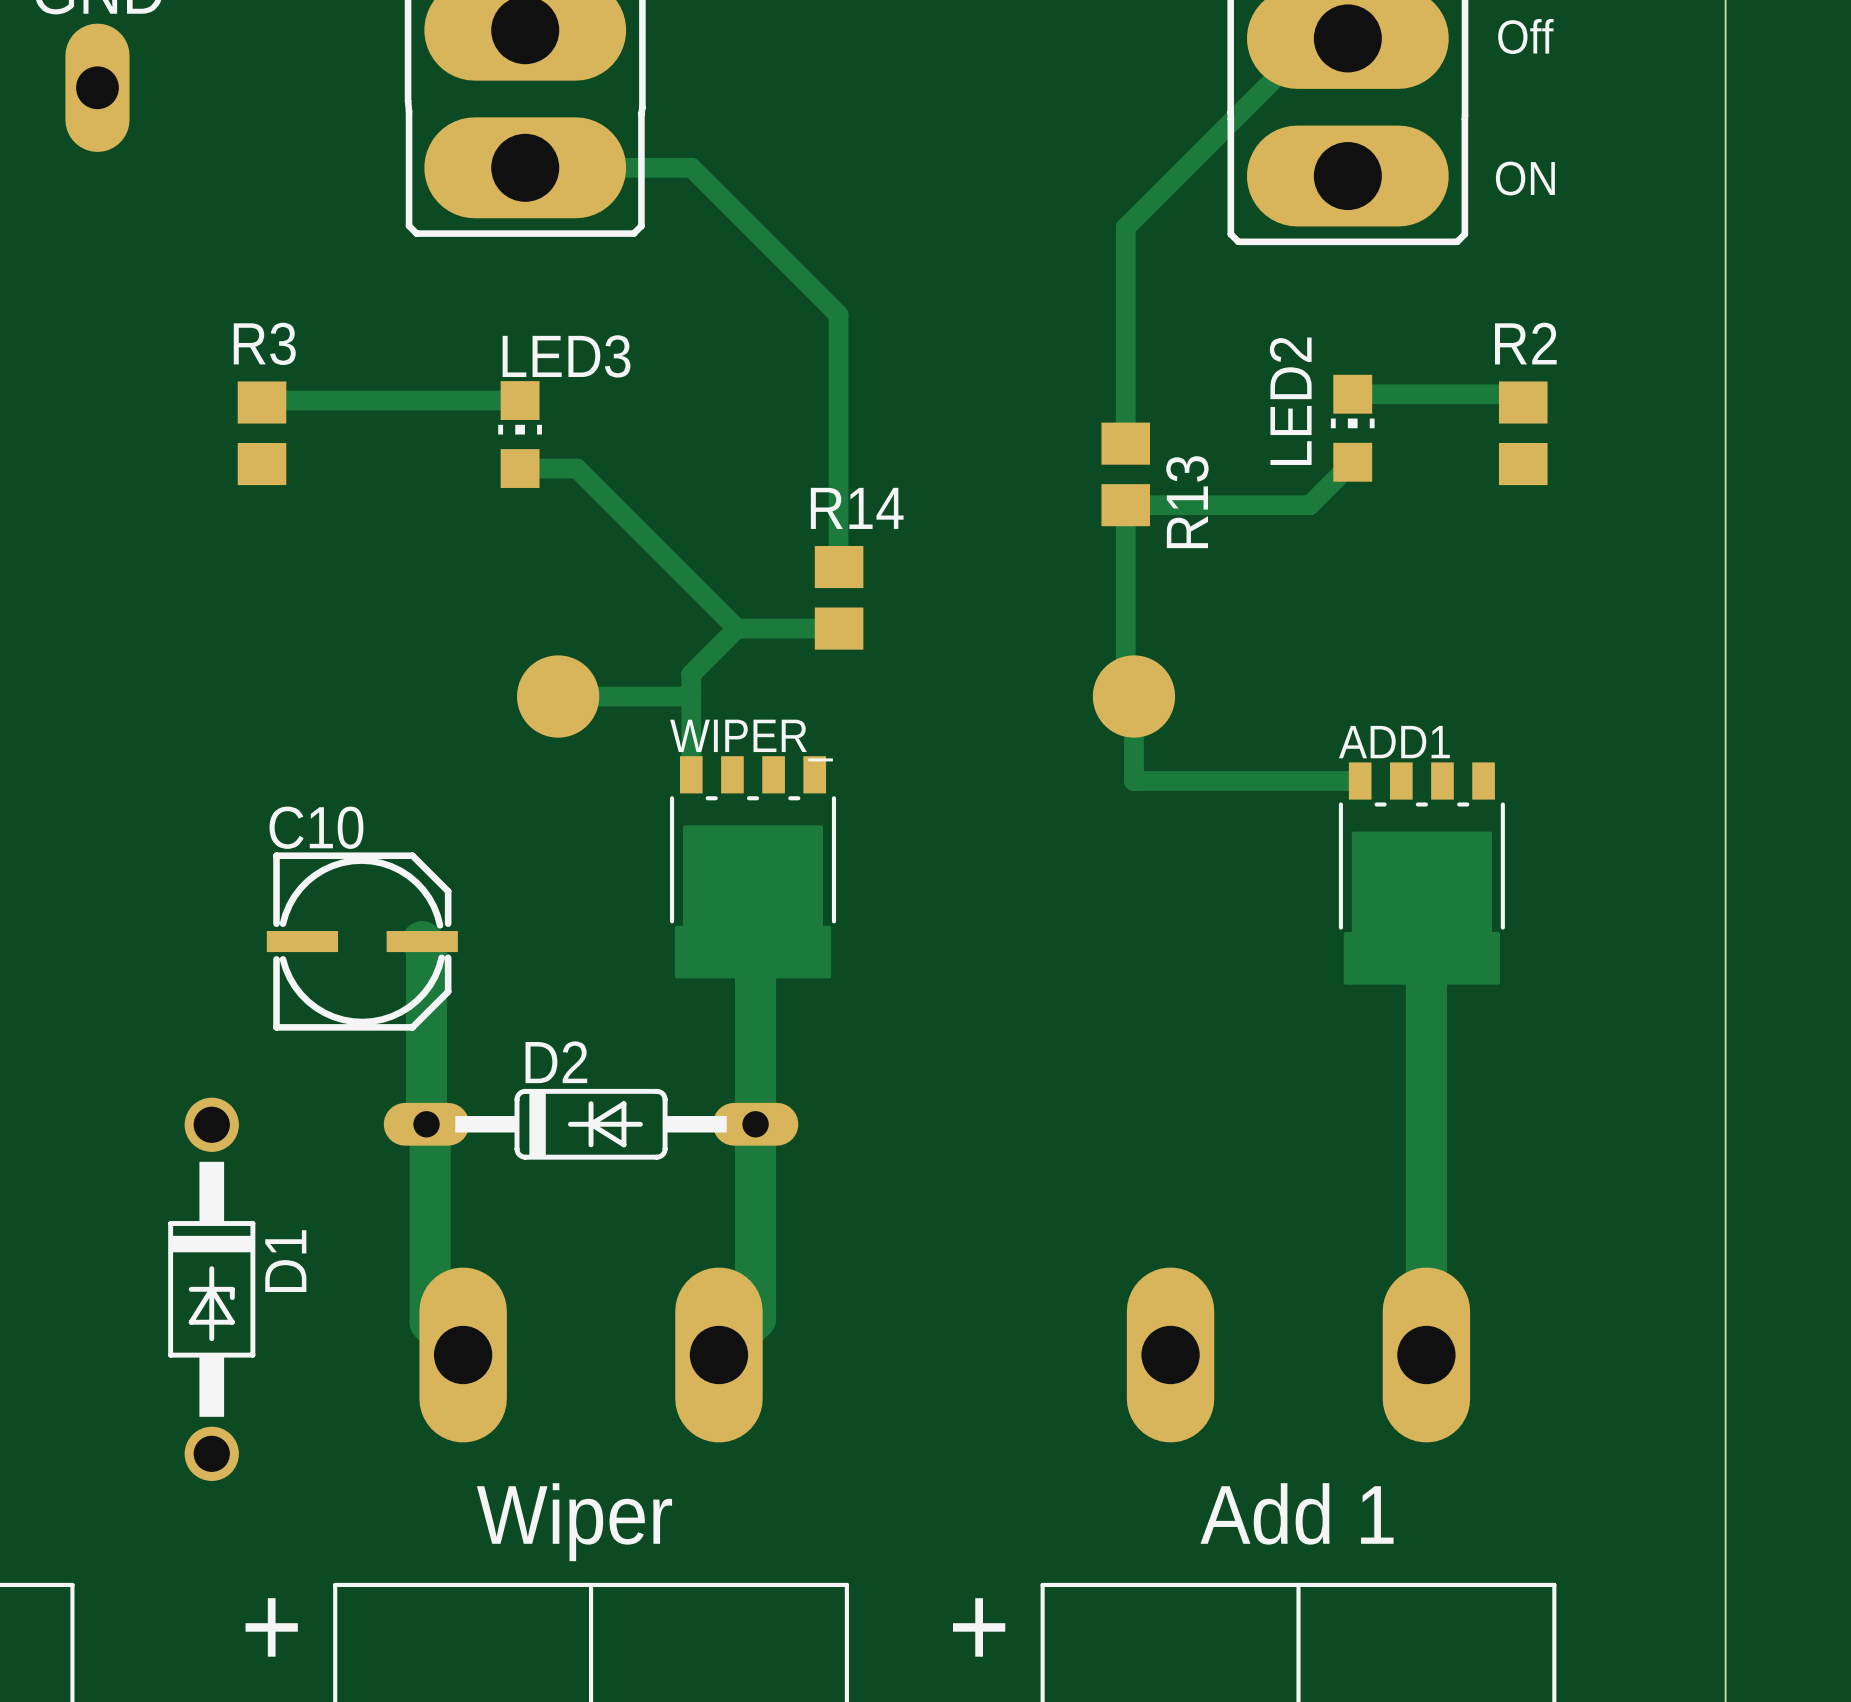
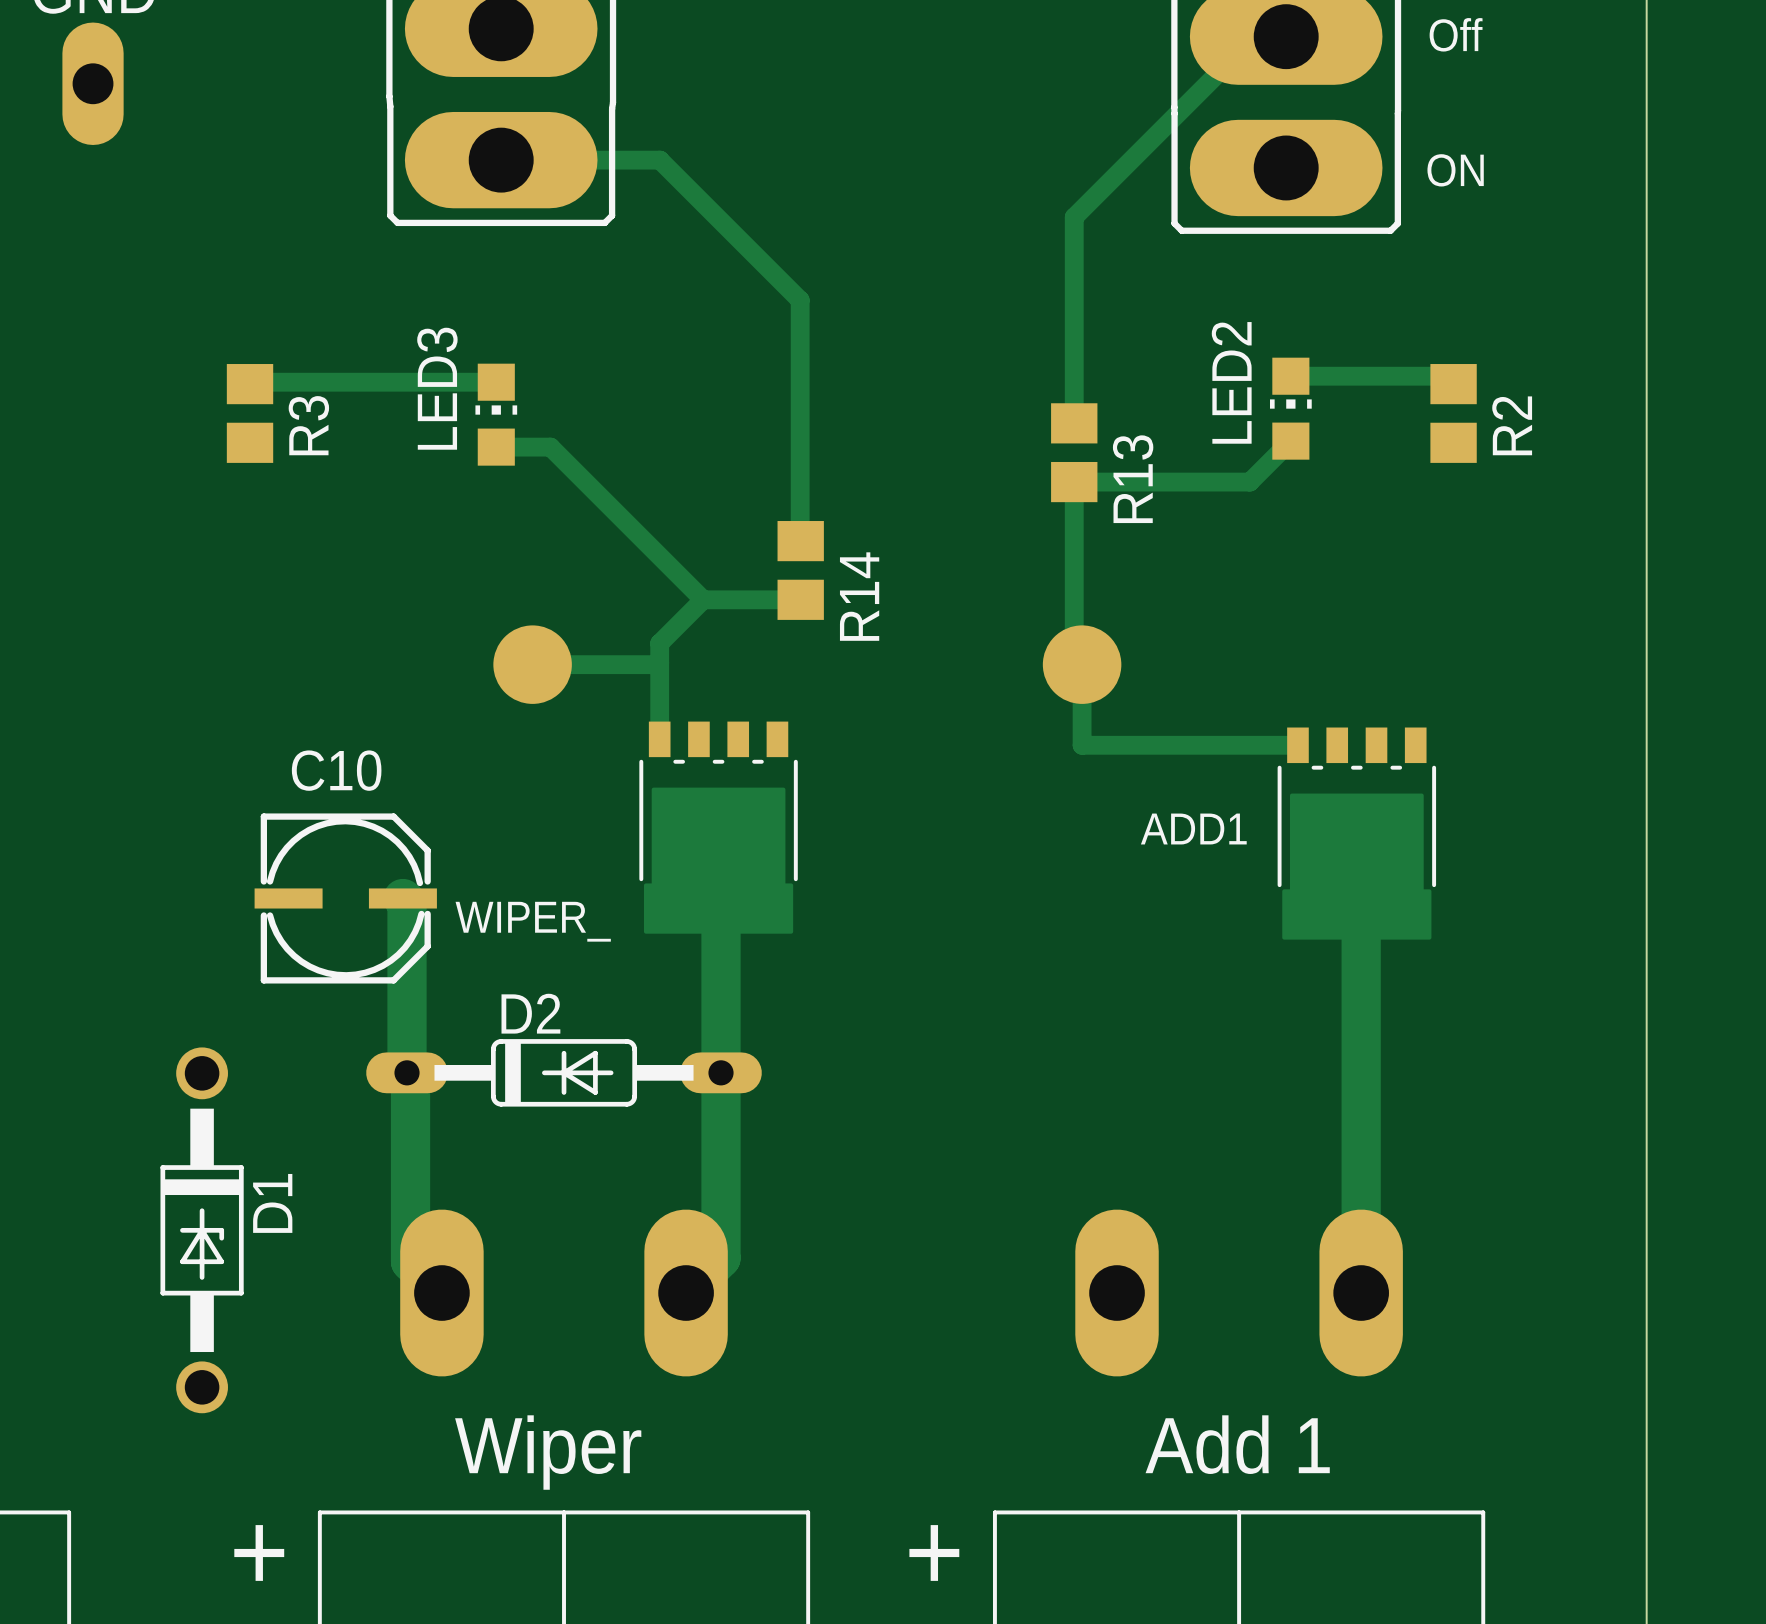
R3 name rotation: 0° (264, 343) -> 90° counterclockwise (308, 425)
R3 name position: R3 (264, 343) -> R3 (308, 425)
R2 name rotation: 0° (1525, 343) -> 90° counterclockwise (1512, 425)
R2 name position: R2 (1525, 343) -> R2 (1512, 425)
LED3 name rotation: 0° (566, 356) -> 90° counterclockwise (437, 388)
R14 name rotation: 0° (857, 508) -> 90° counterclockwise (859, 596)
R14 name position: R14 (857, 508) -> R14 (859, 596)
WIPER_ name position: WIPER_ (751, 740) -> WIPER_ (533, 921)
ADD1 name position: ADD1 (1394, 742) -> ADD1 (1193, 829)
C10 name position: C10 (316, 827) -> C10 (336, 770)

